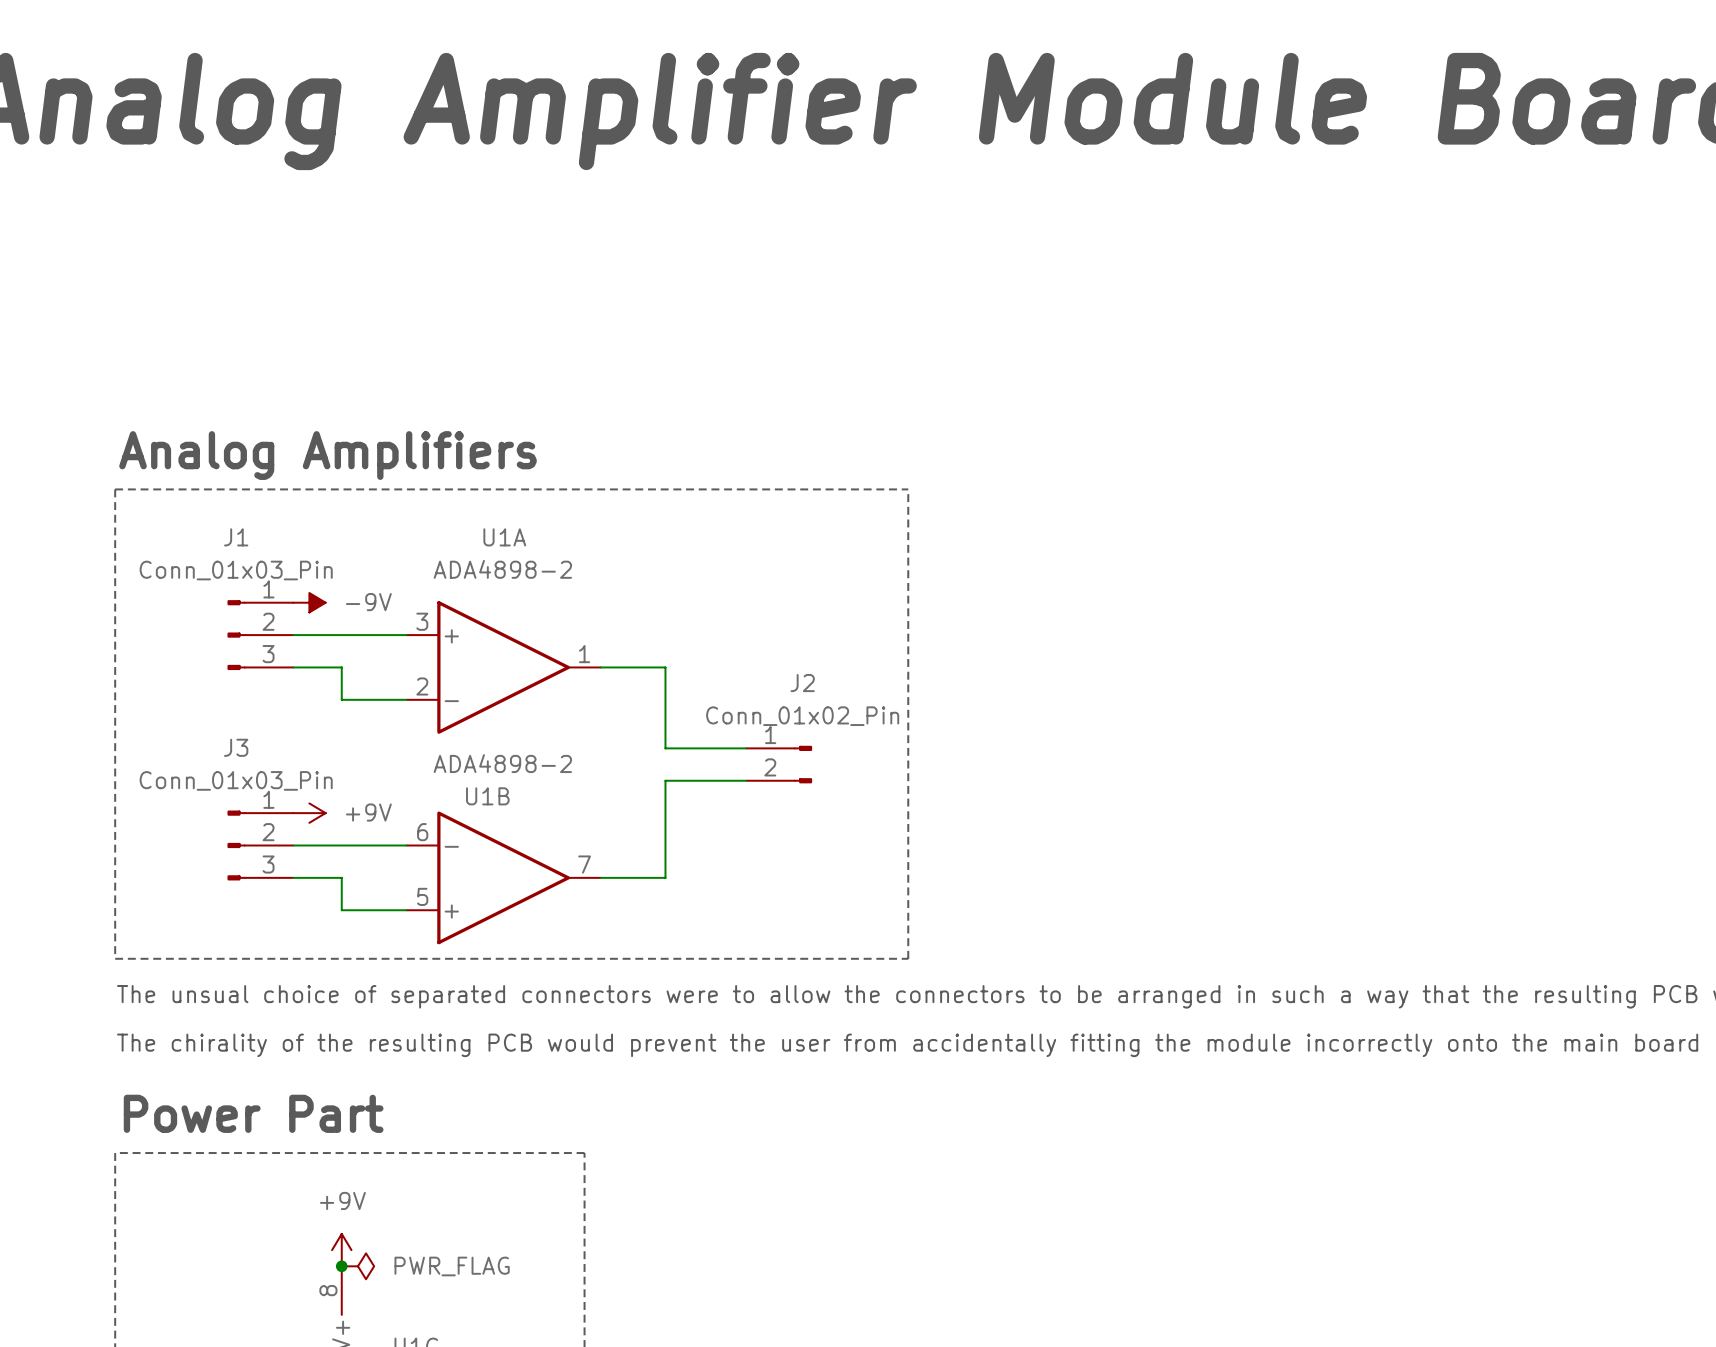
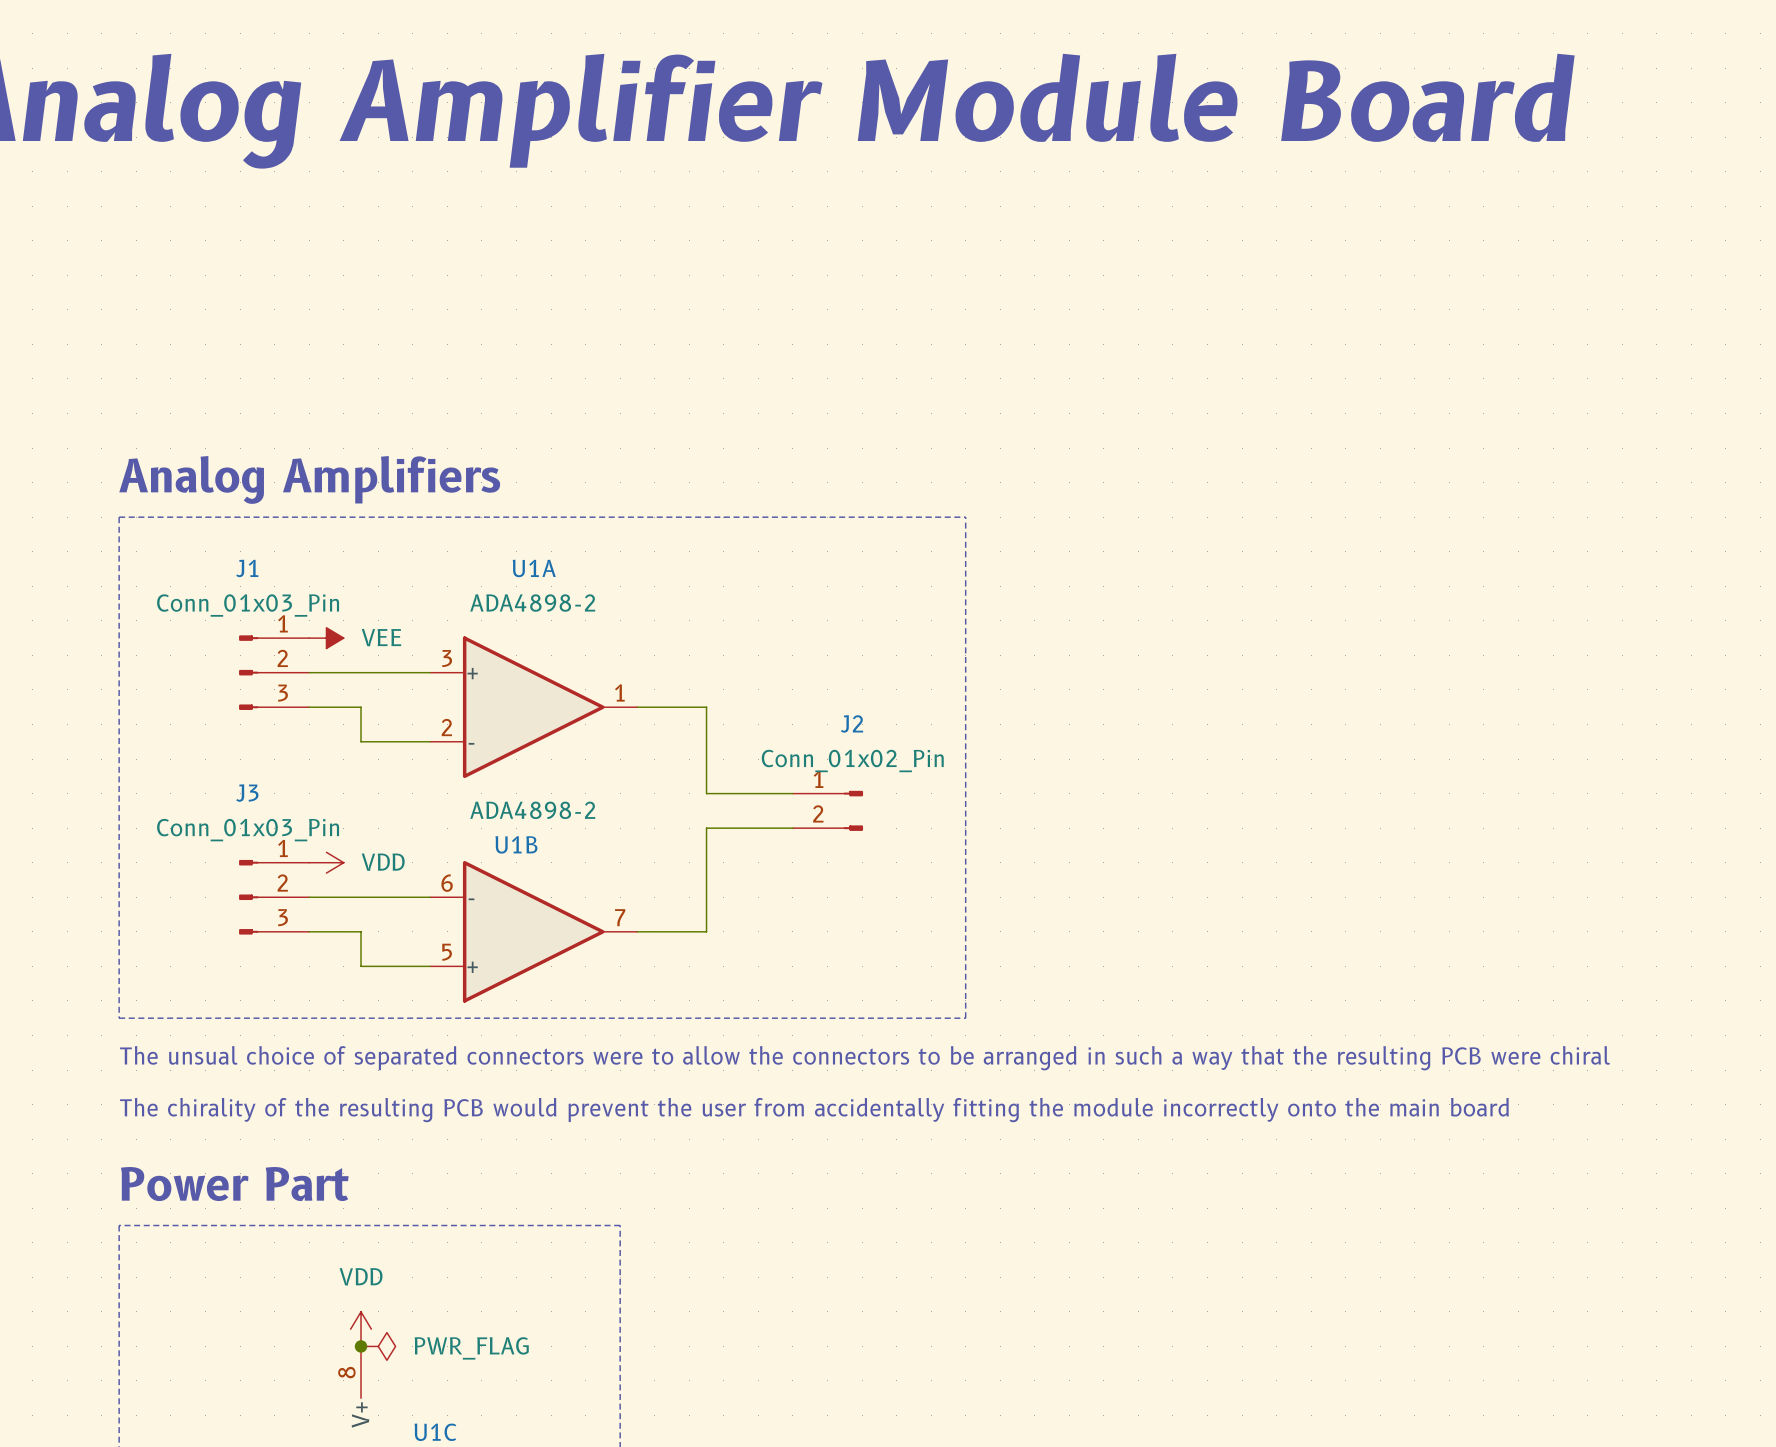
power symbol: -9V (309, 602) -> VEE (326, 638)
power symbol: +9V (309, 813) -> VDD (326, 862)
power symbol: +9V (341, 1250) -> VDD (361, 1329)

